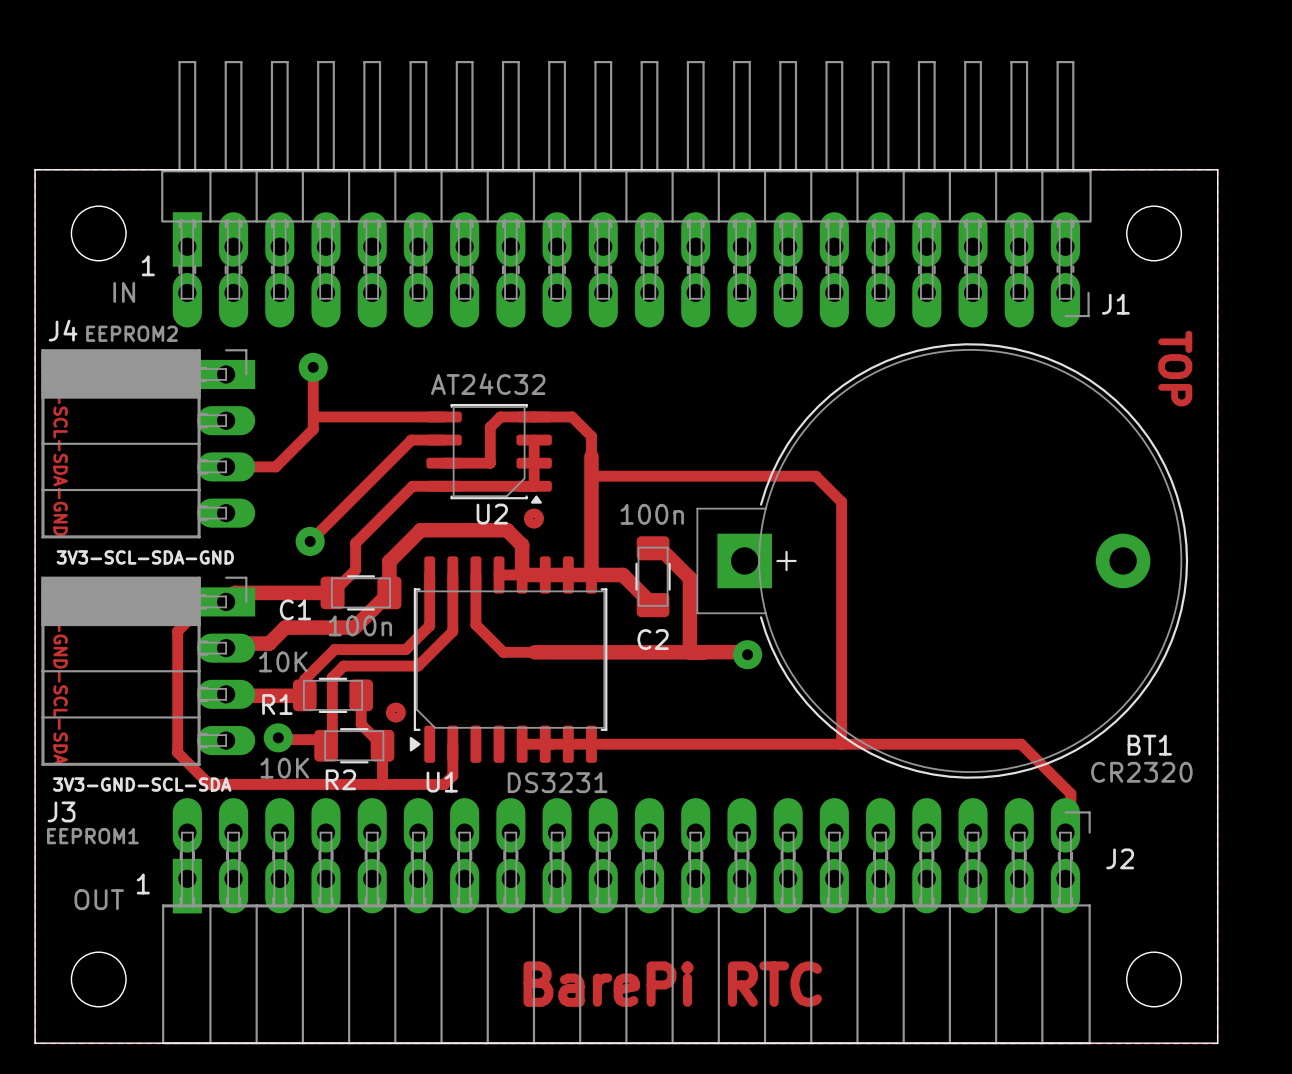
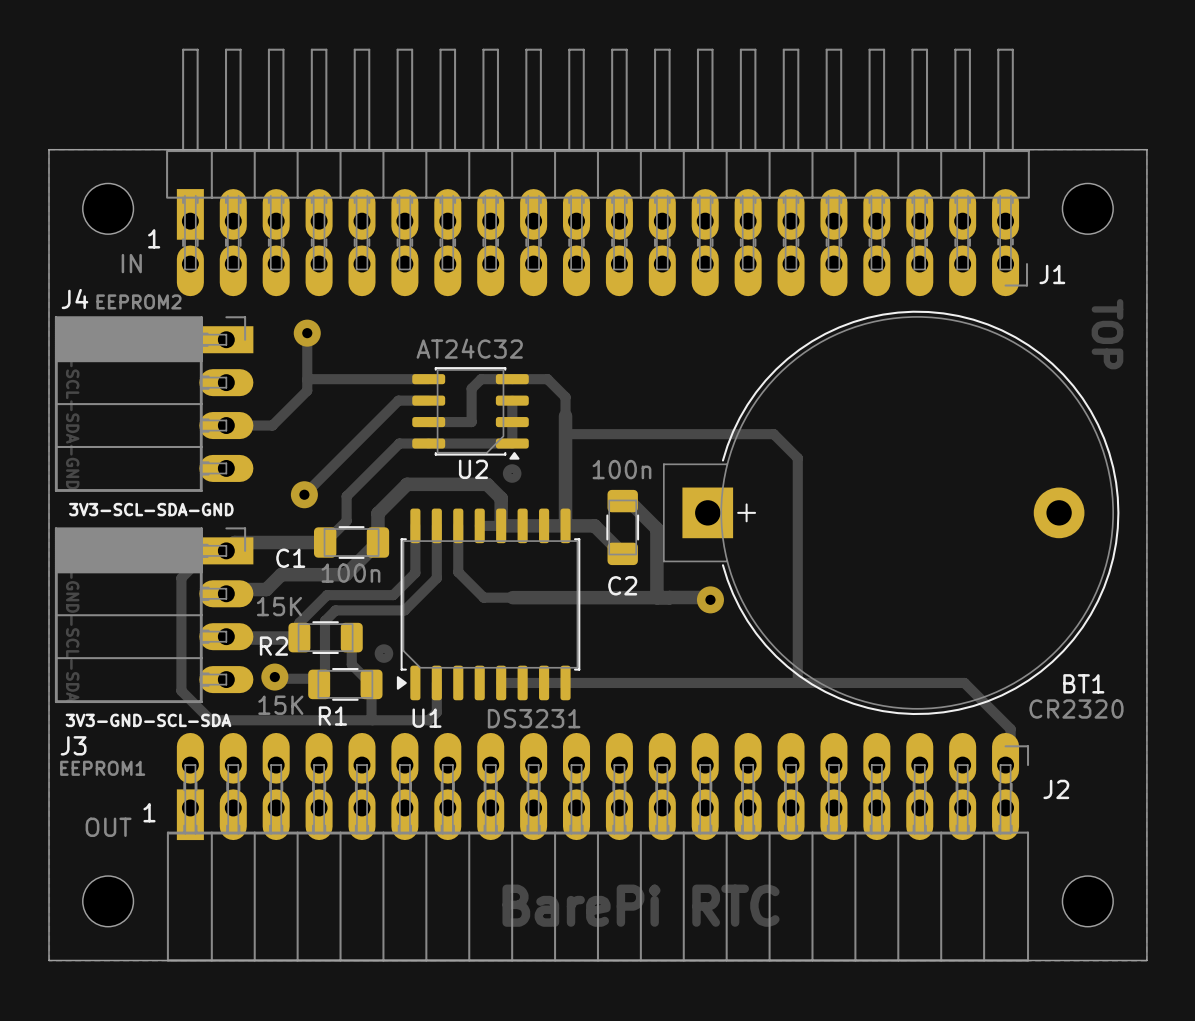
R1 value: 10K (283, 661) -> 15K (279, 606)
R1 name: R1 (277, 704) -> R2 (273, 646)
R2 value: 10K (284, 768) -> 15K (280, 705)
R2 name: R2 (340, 779) -> R1 (332, 716)

